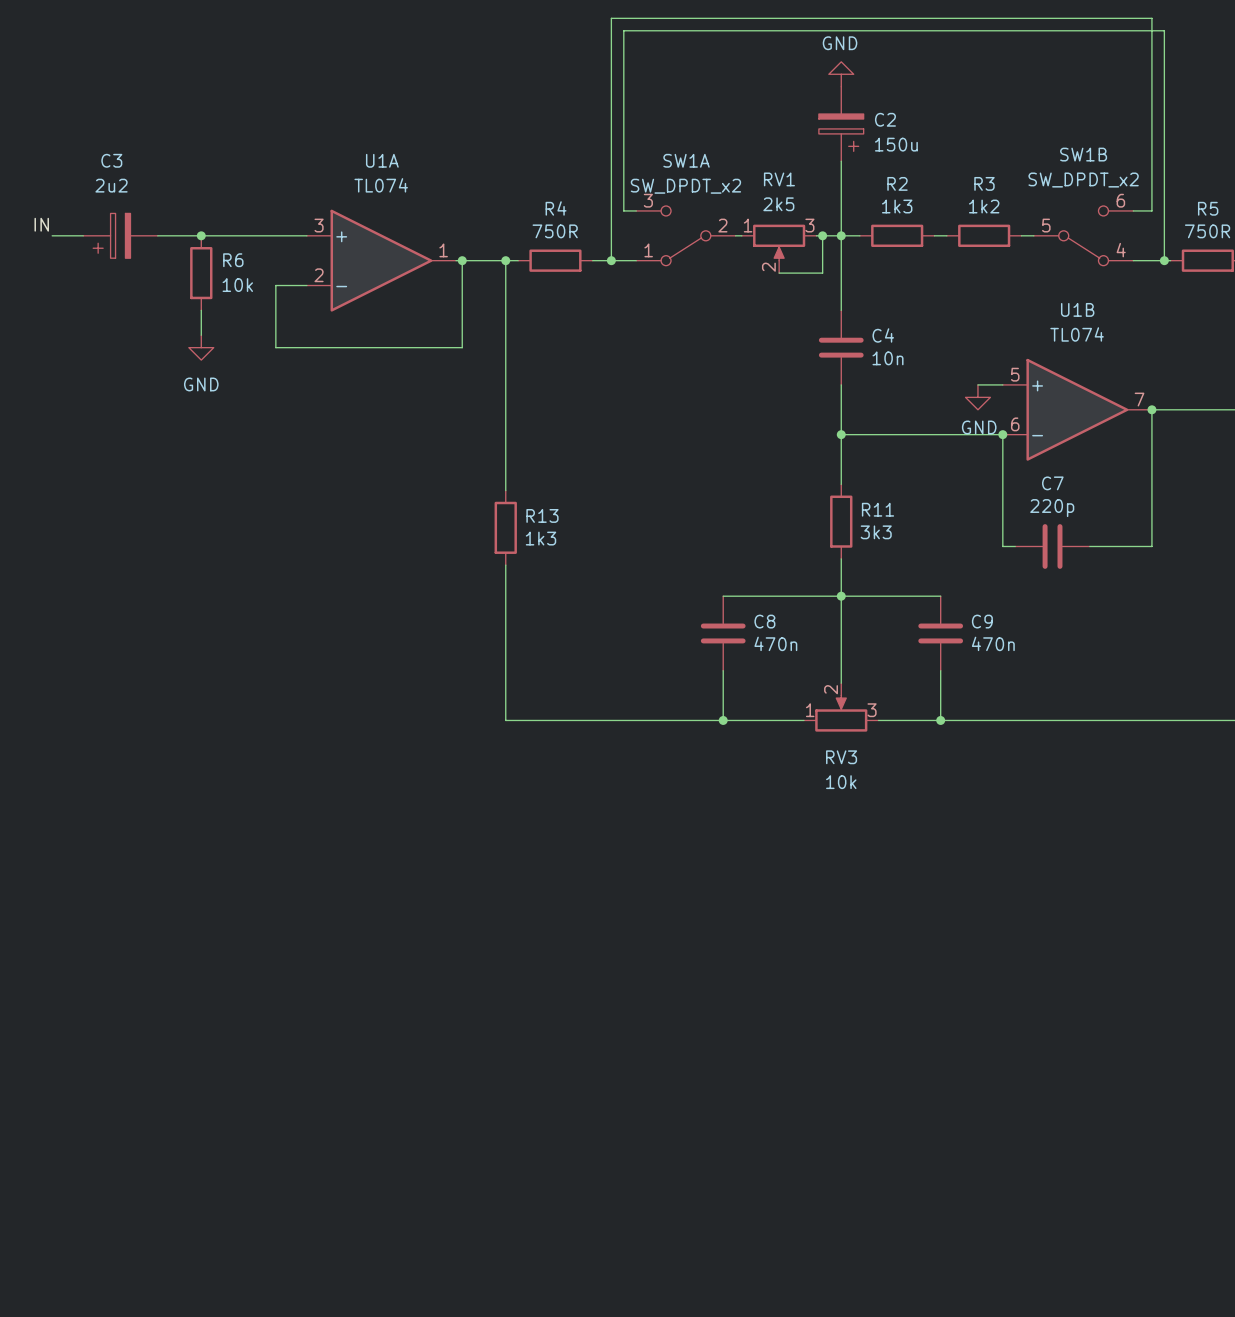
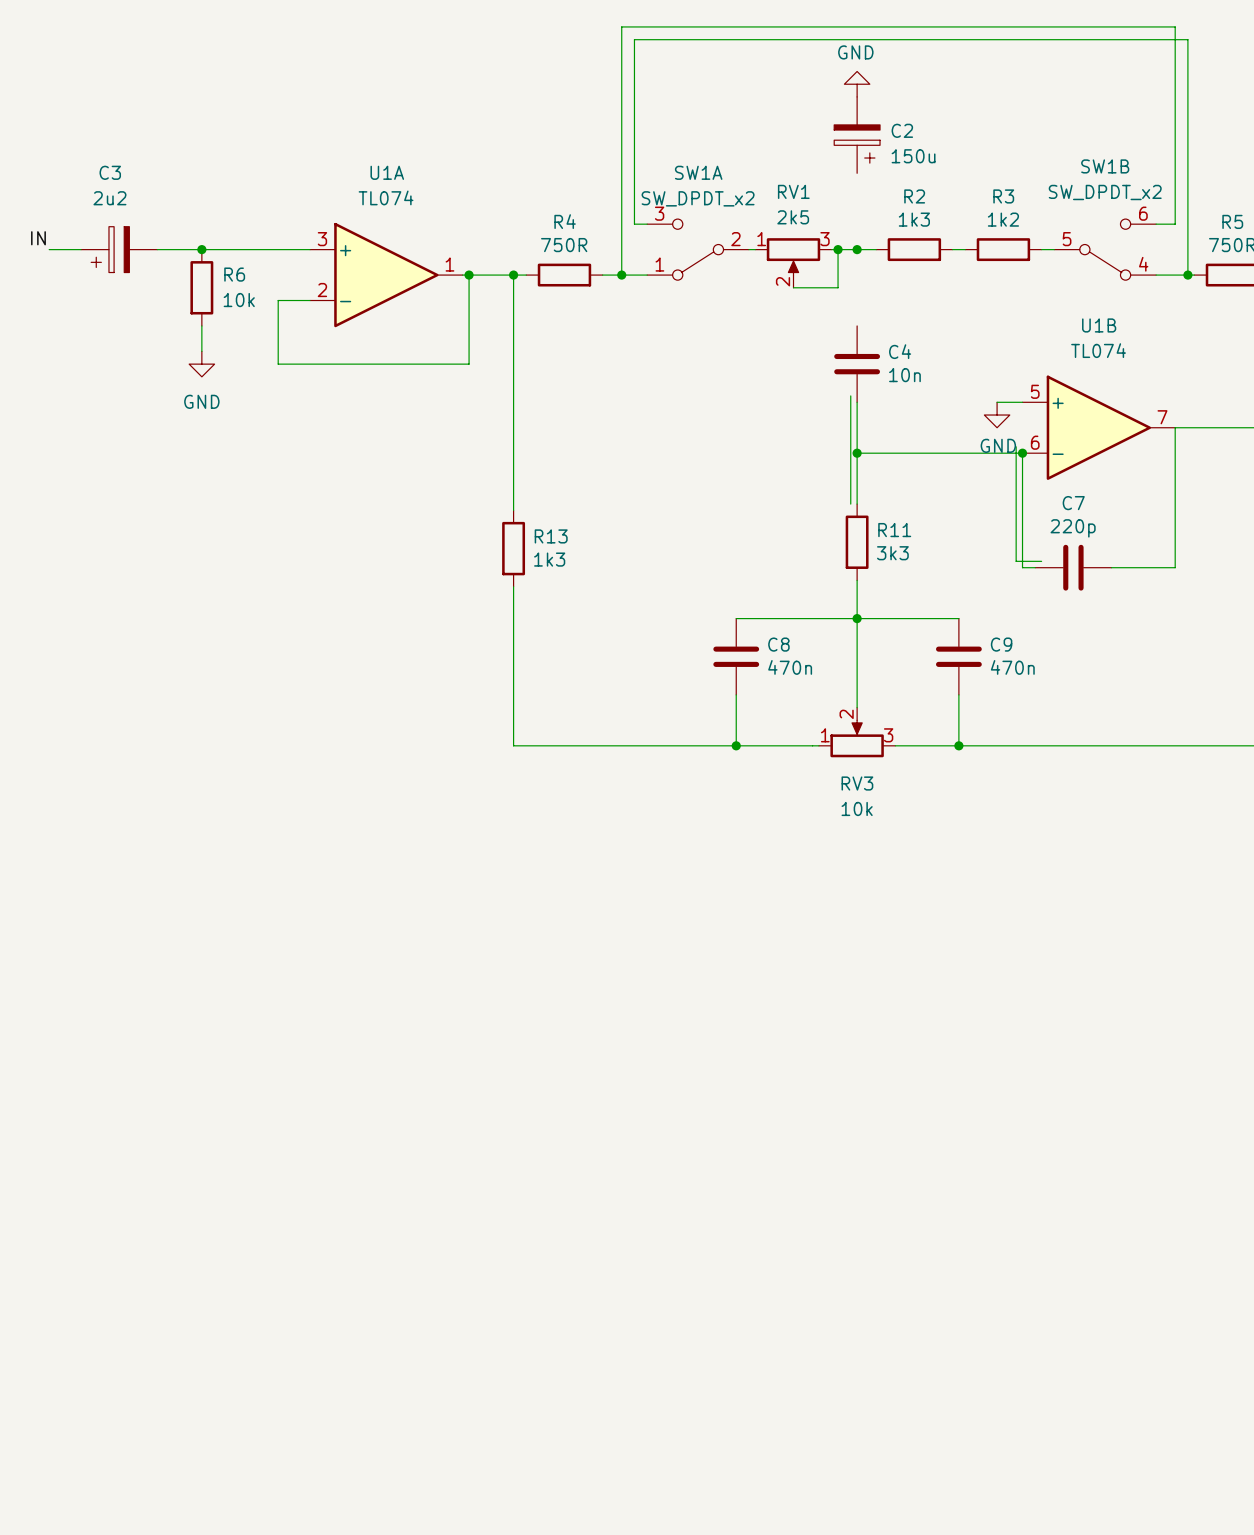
wire: (841, 161) (841, 310) -> none
wire: none -> (850, 395) (850, 504)
junction: (1151, 409) -> none
wire: none -> (1016, 446) (1016, 561) (1041, 561)

